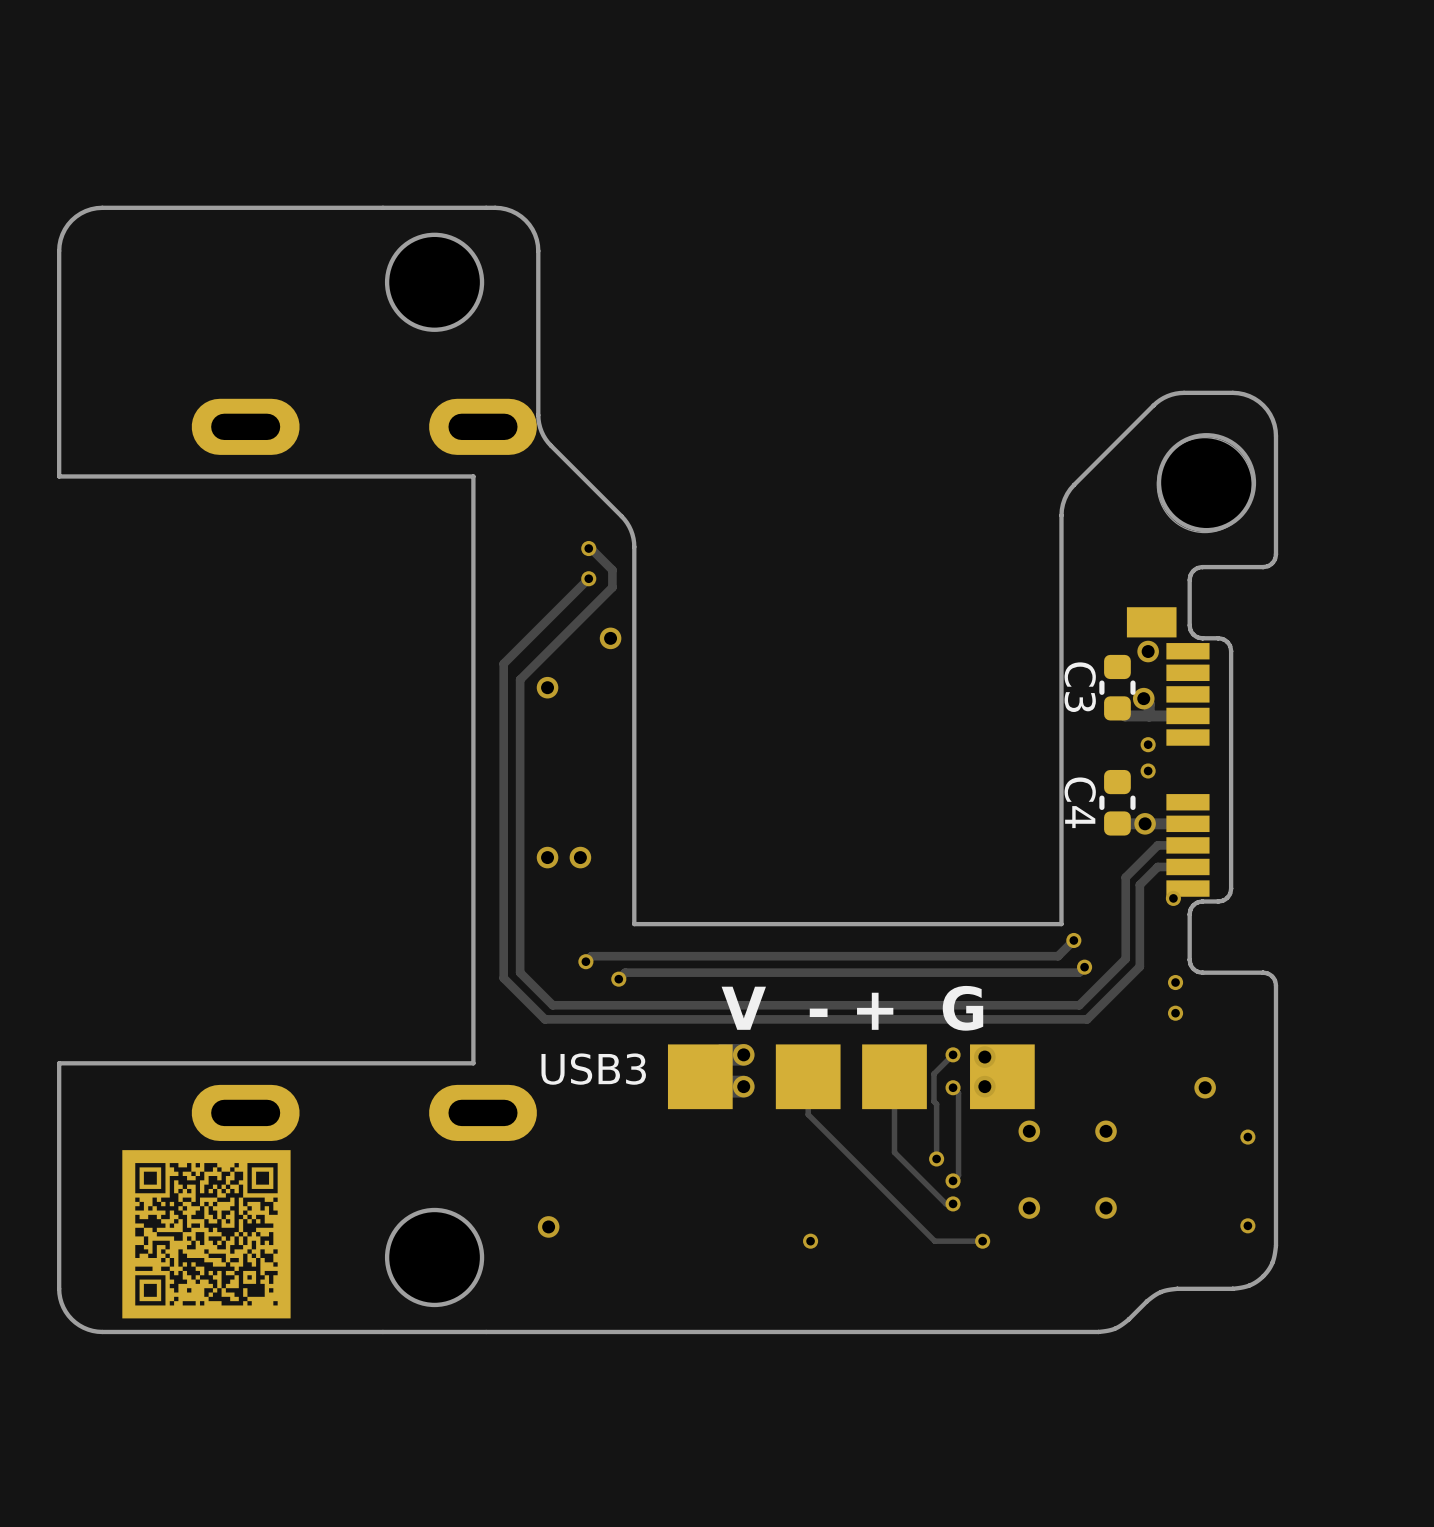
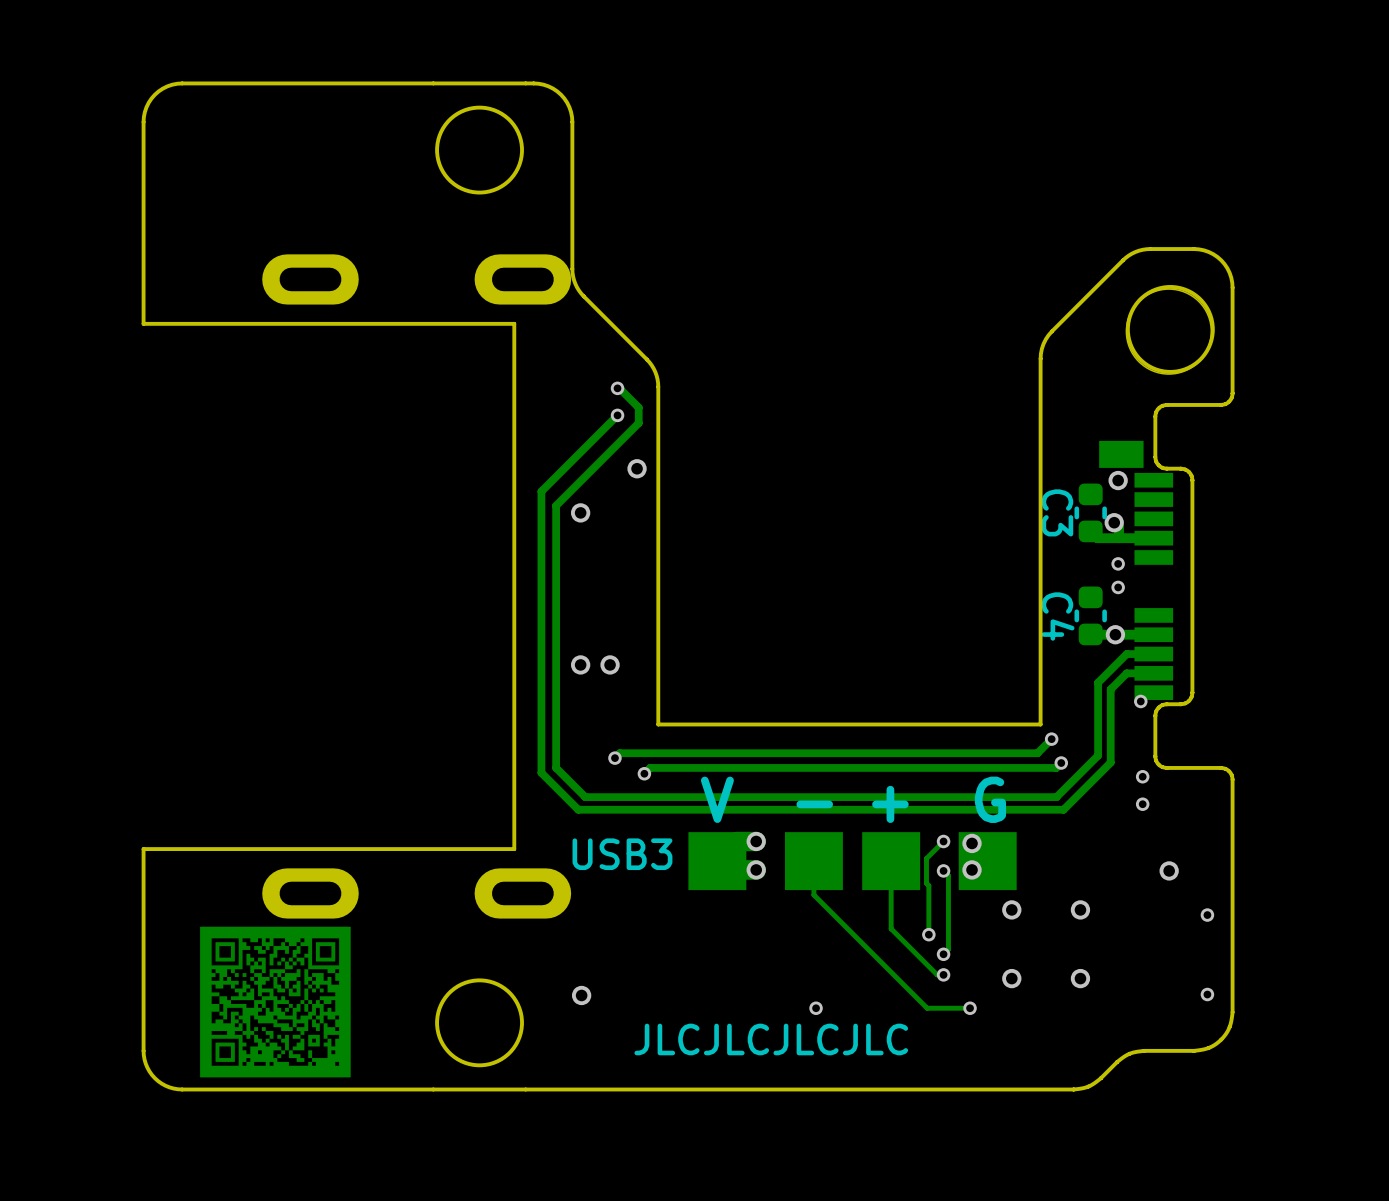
text: none -> JLCJLCJLCJLC (771, 1039)

